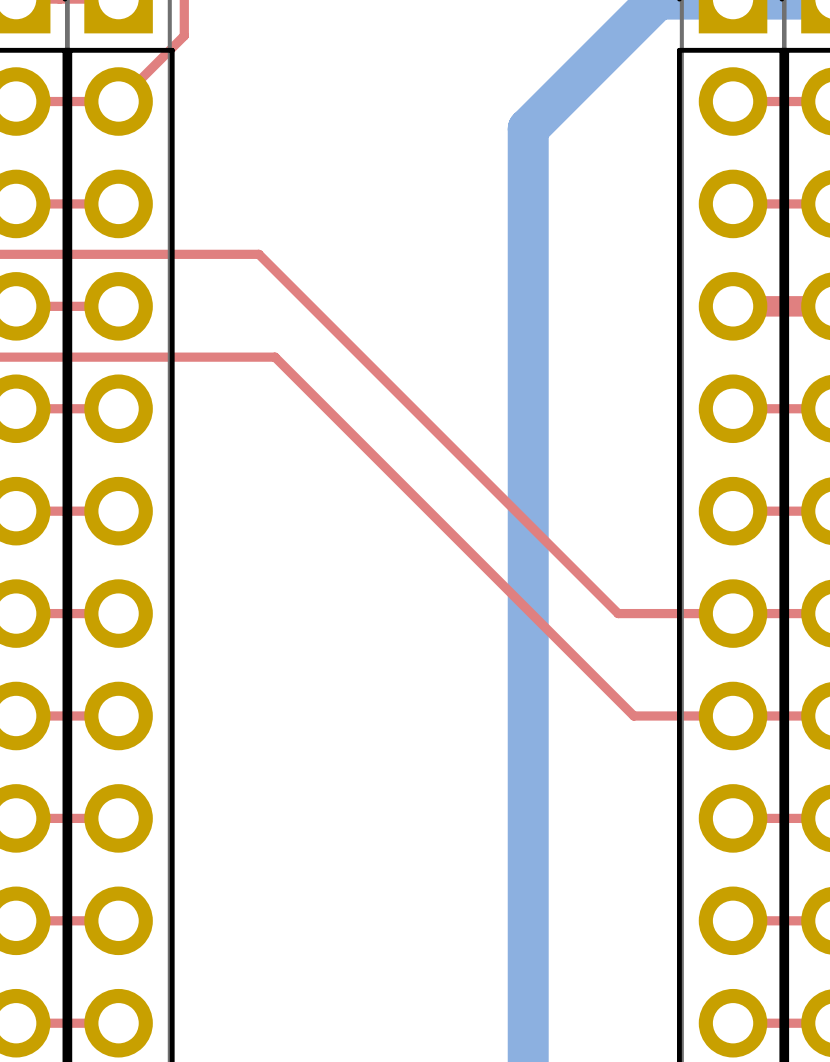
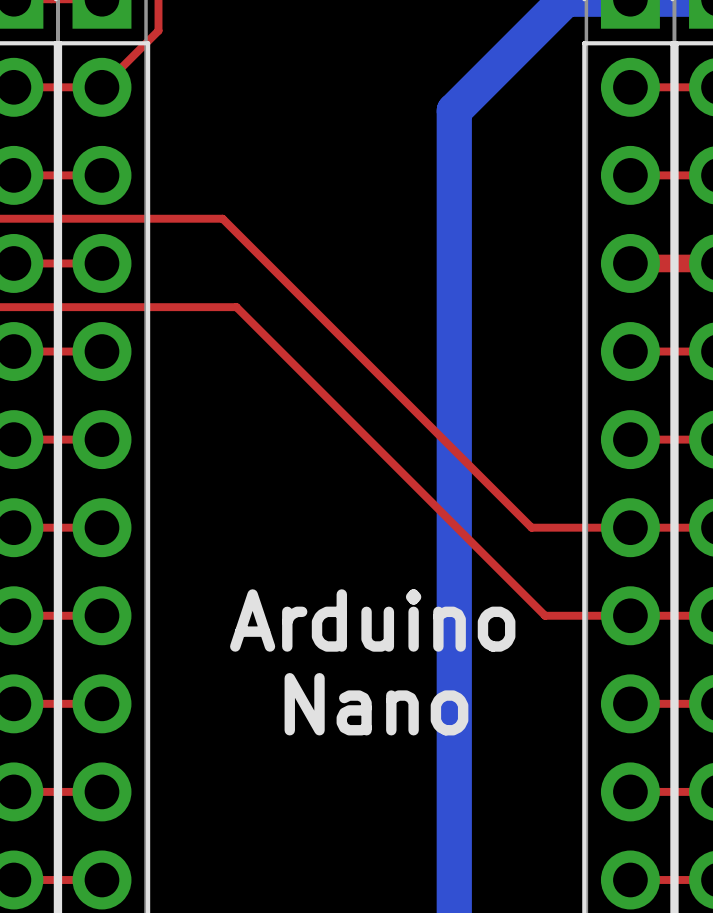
text: none -> Arduino (372, 620)
text: none -> Nano (376, 704)

